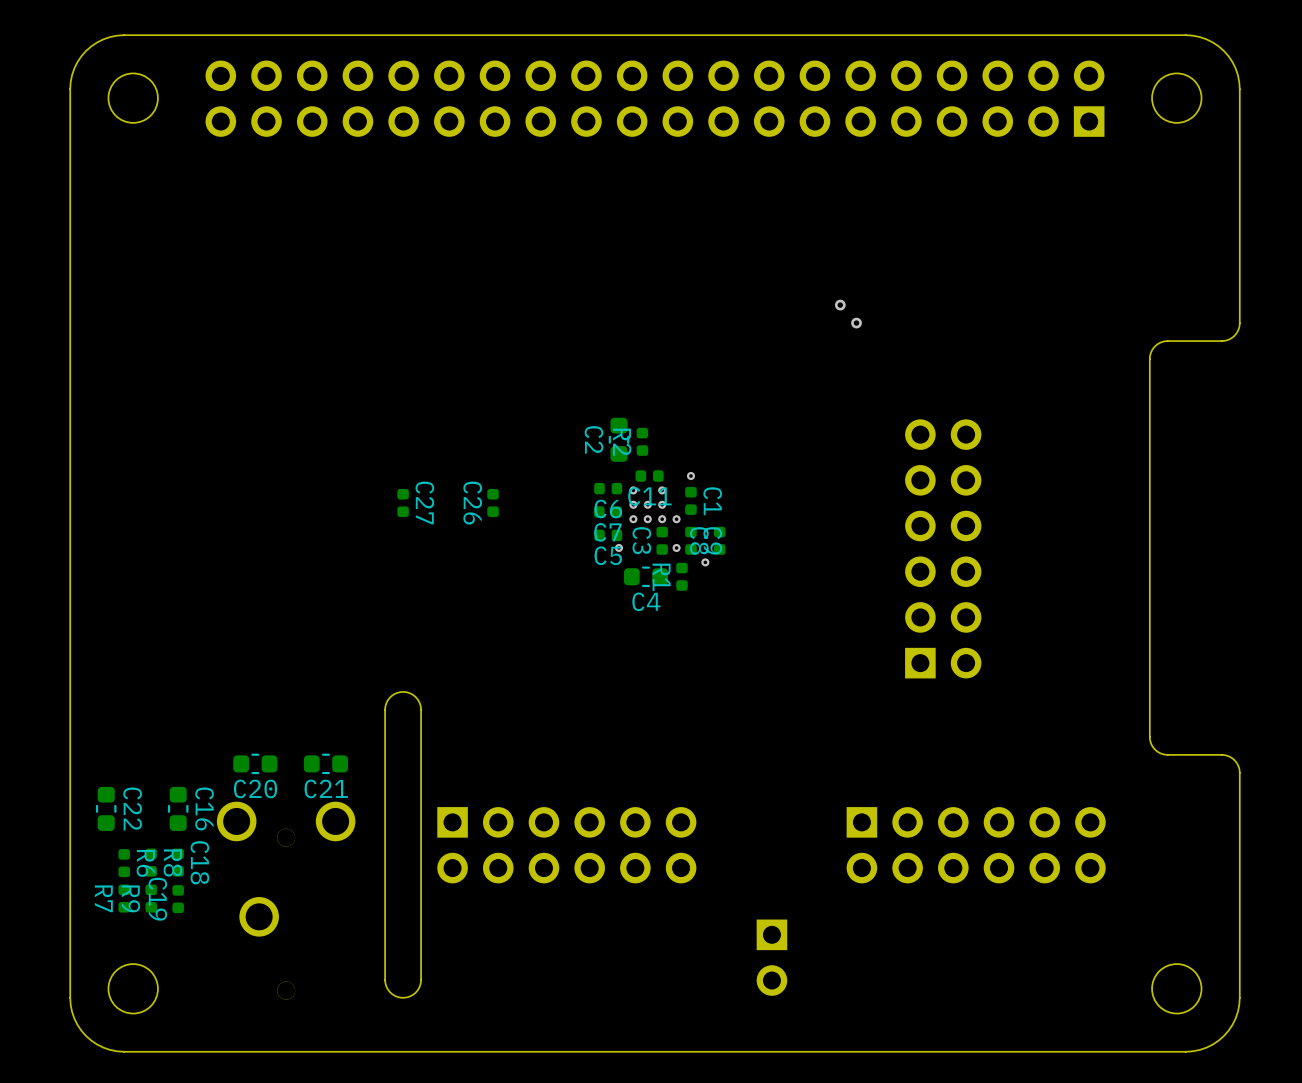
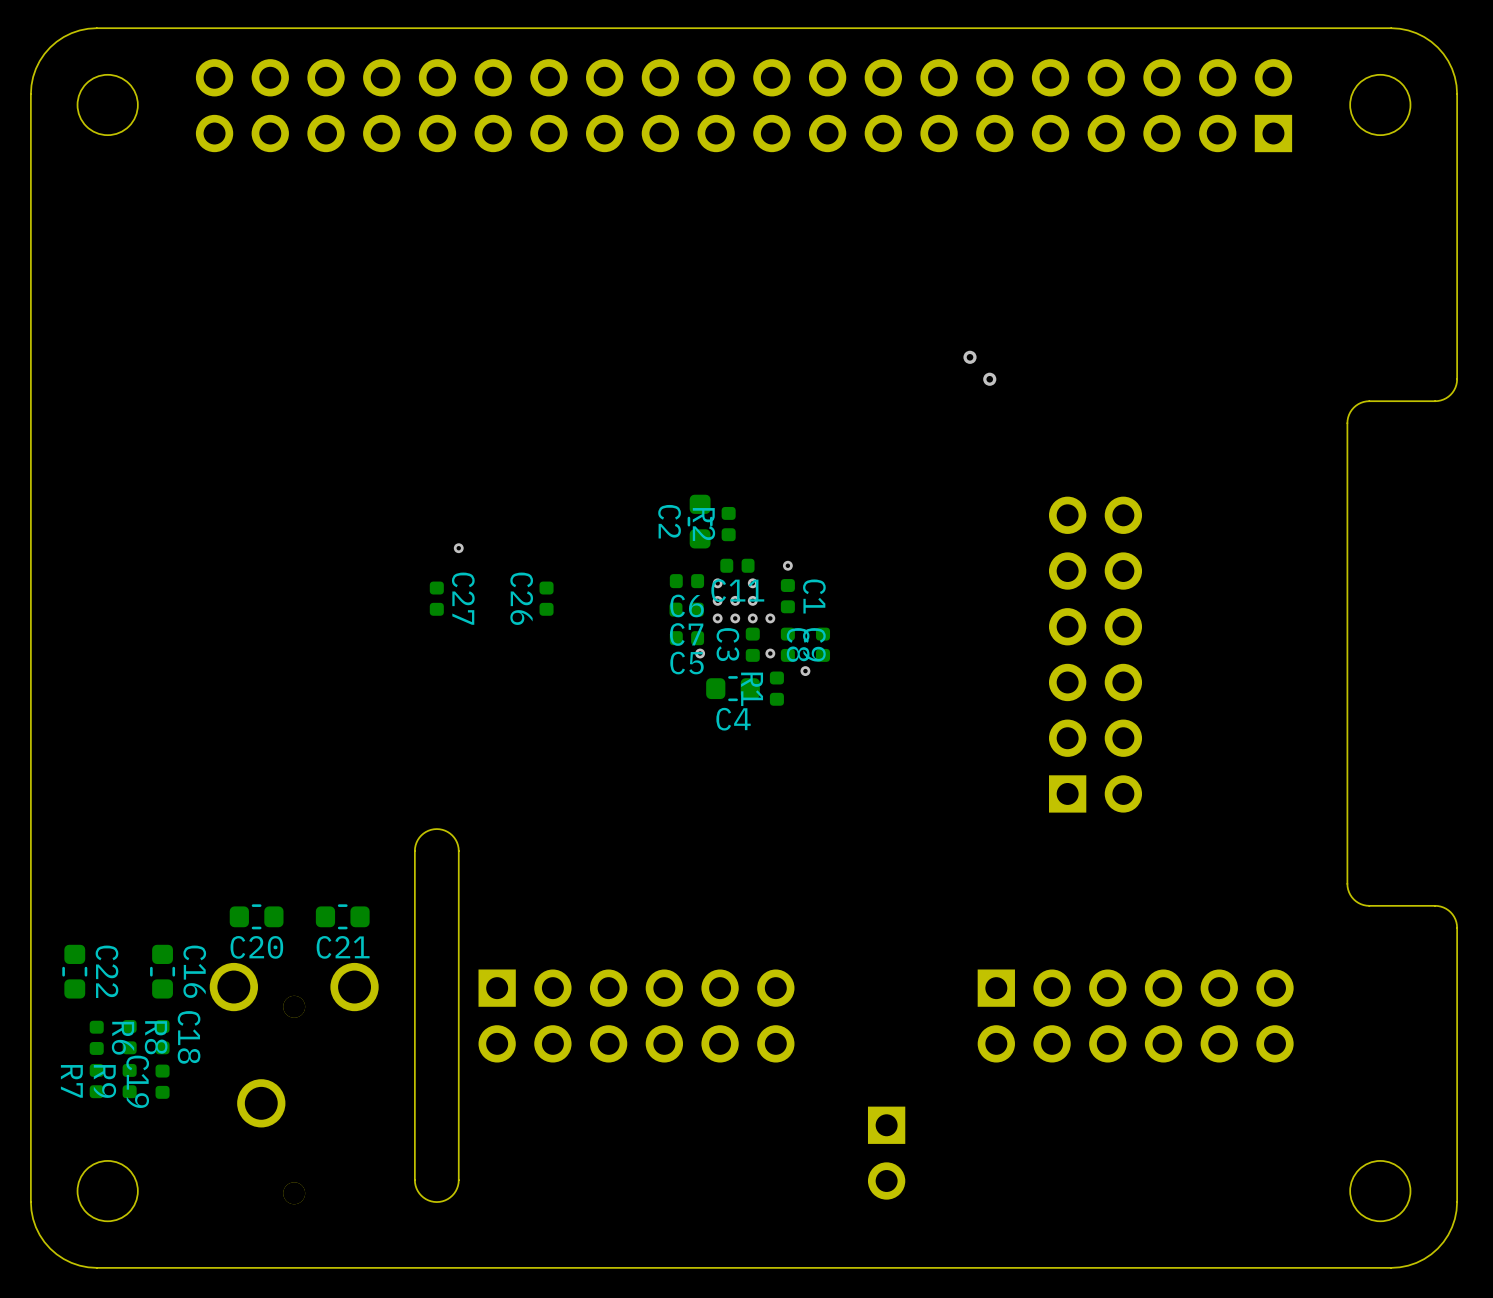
via: none -> (458, 548)

